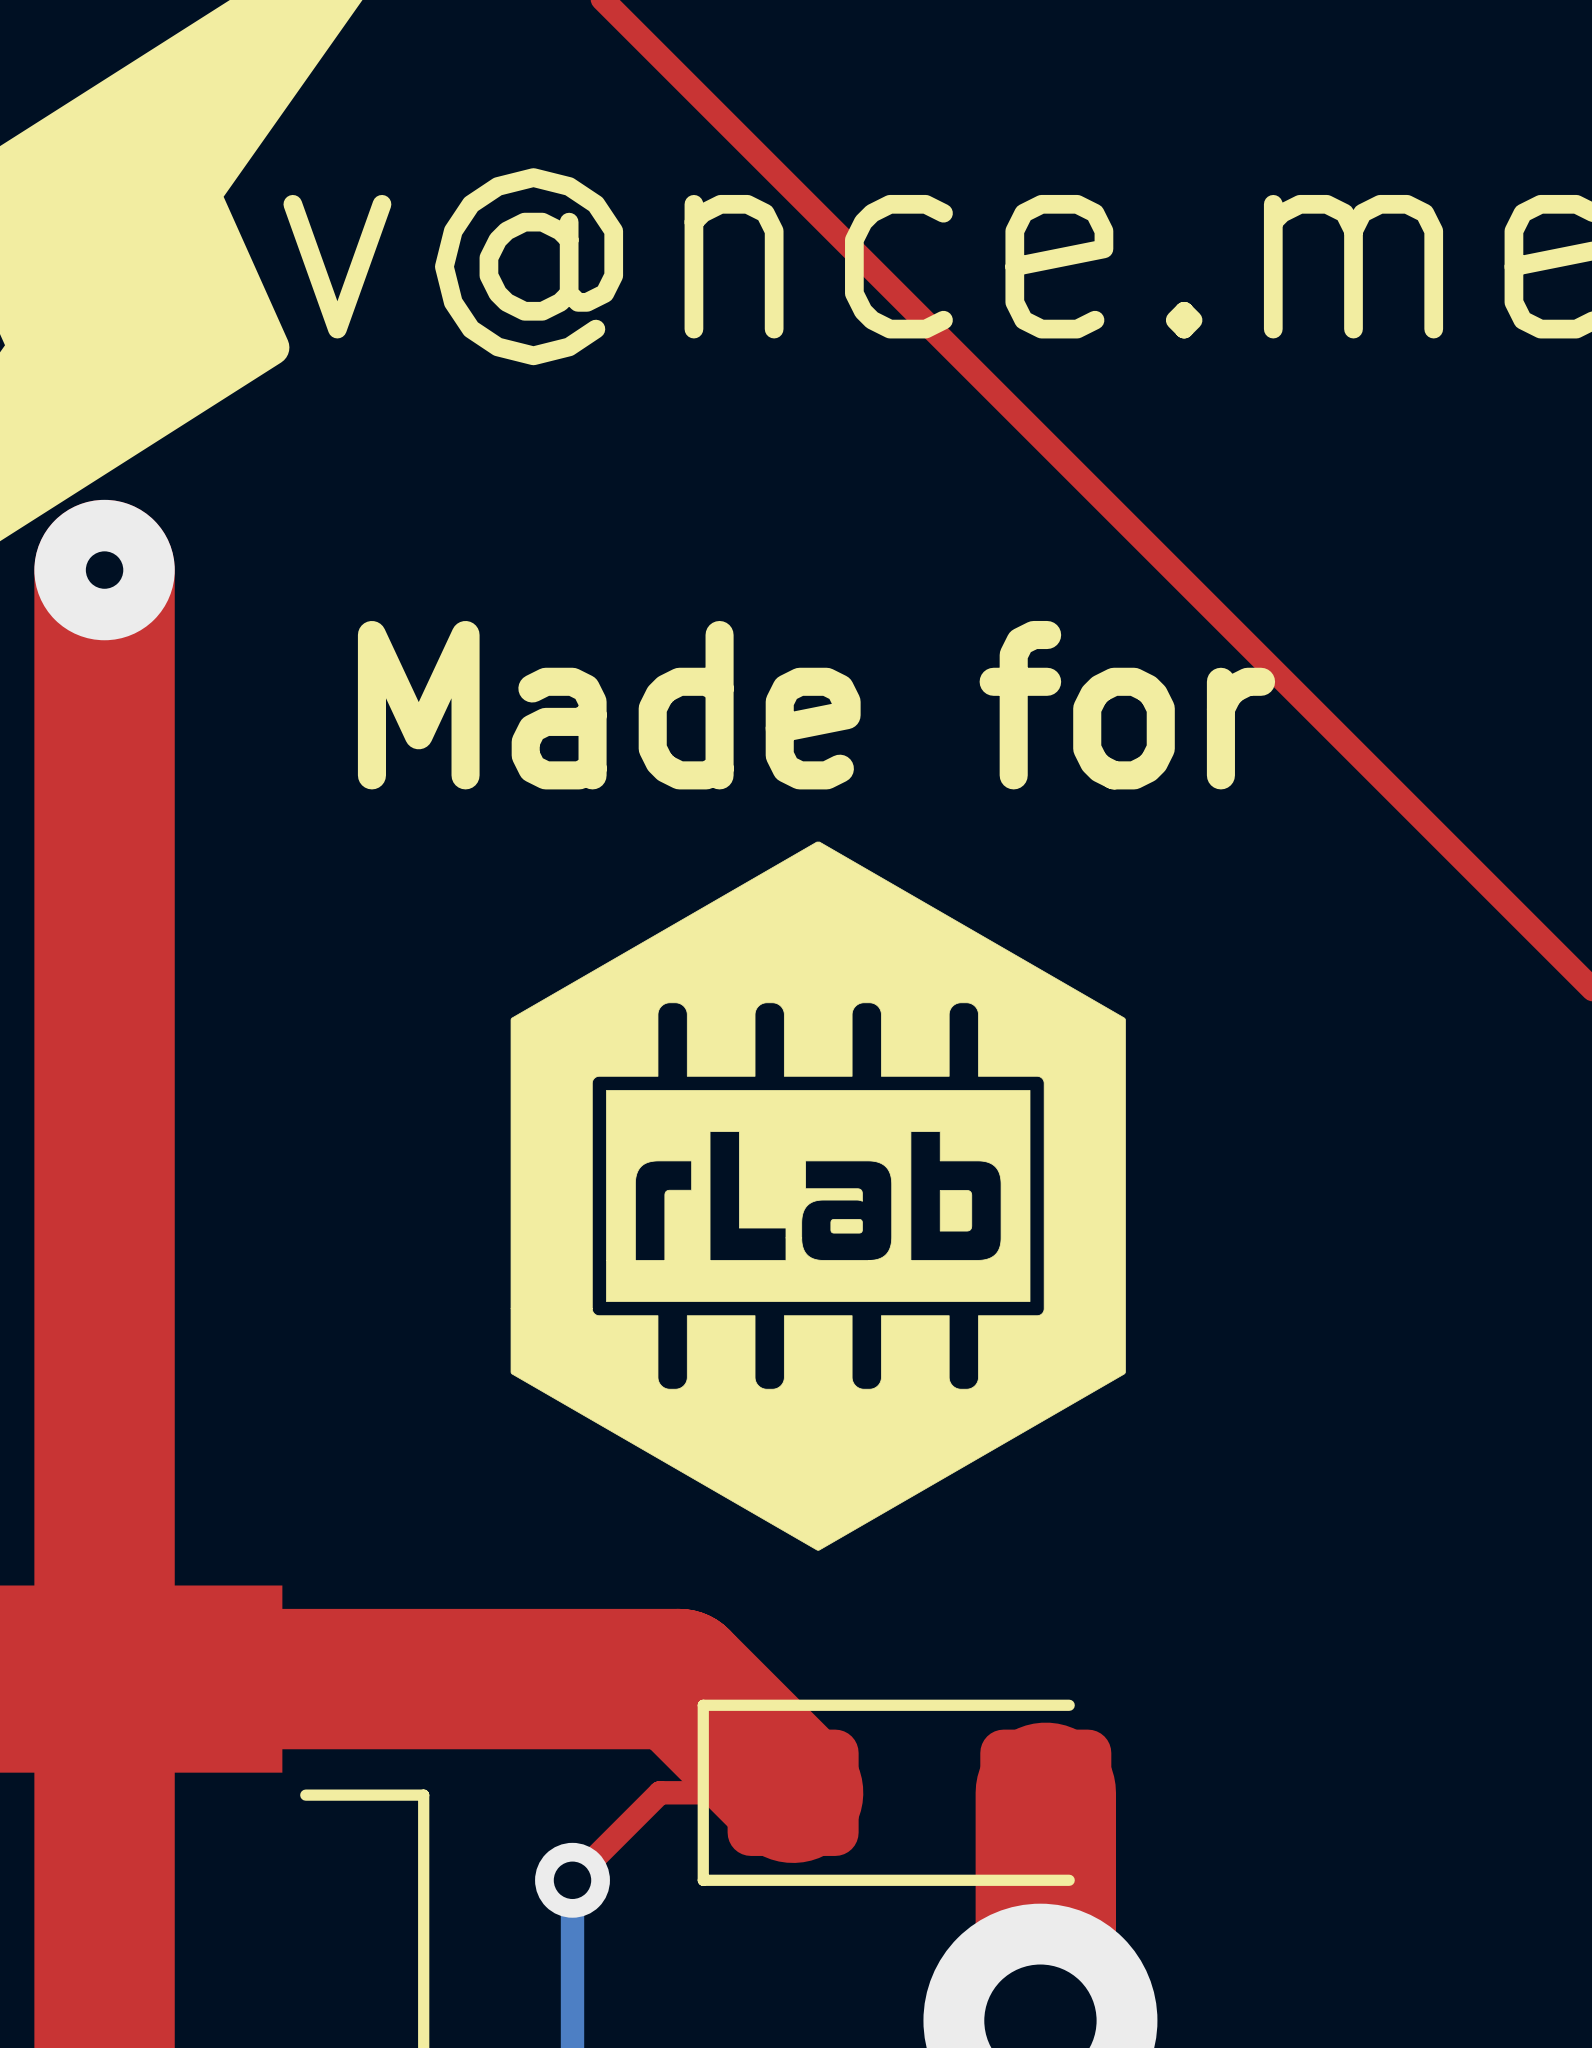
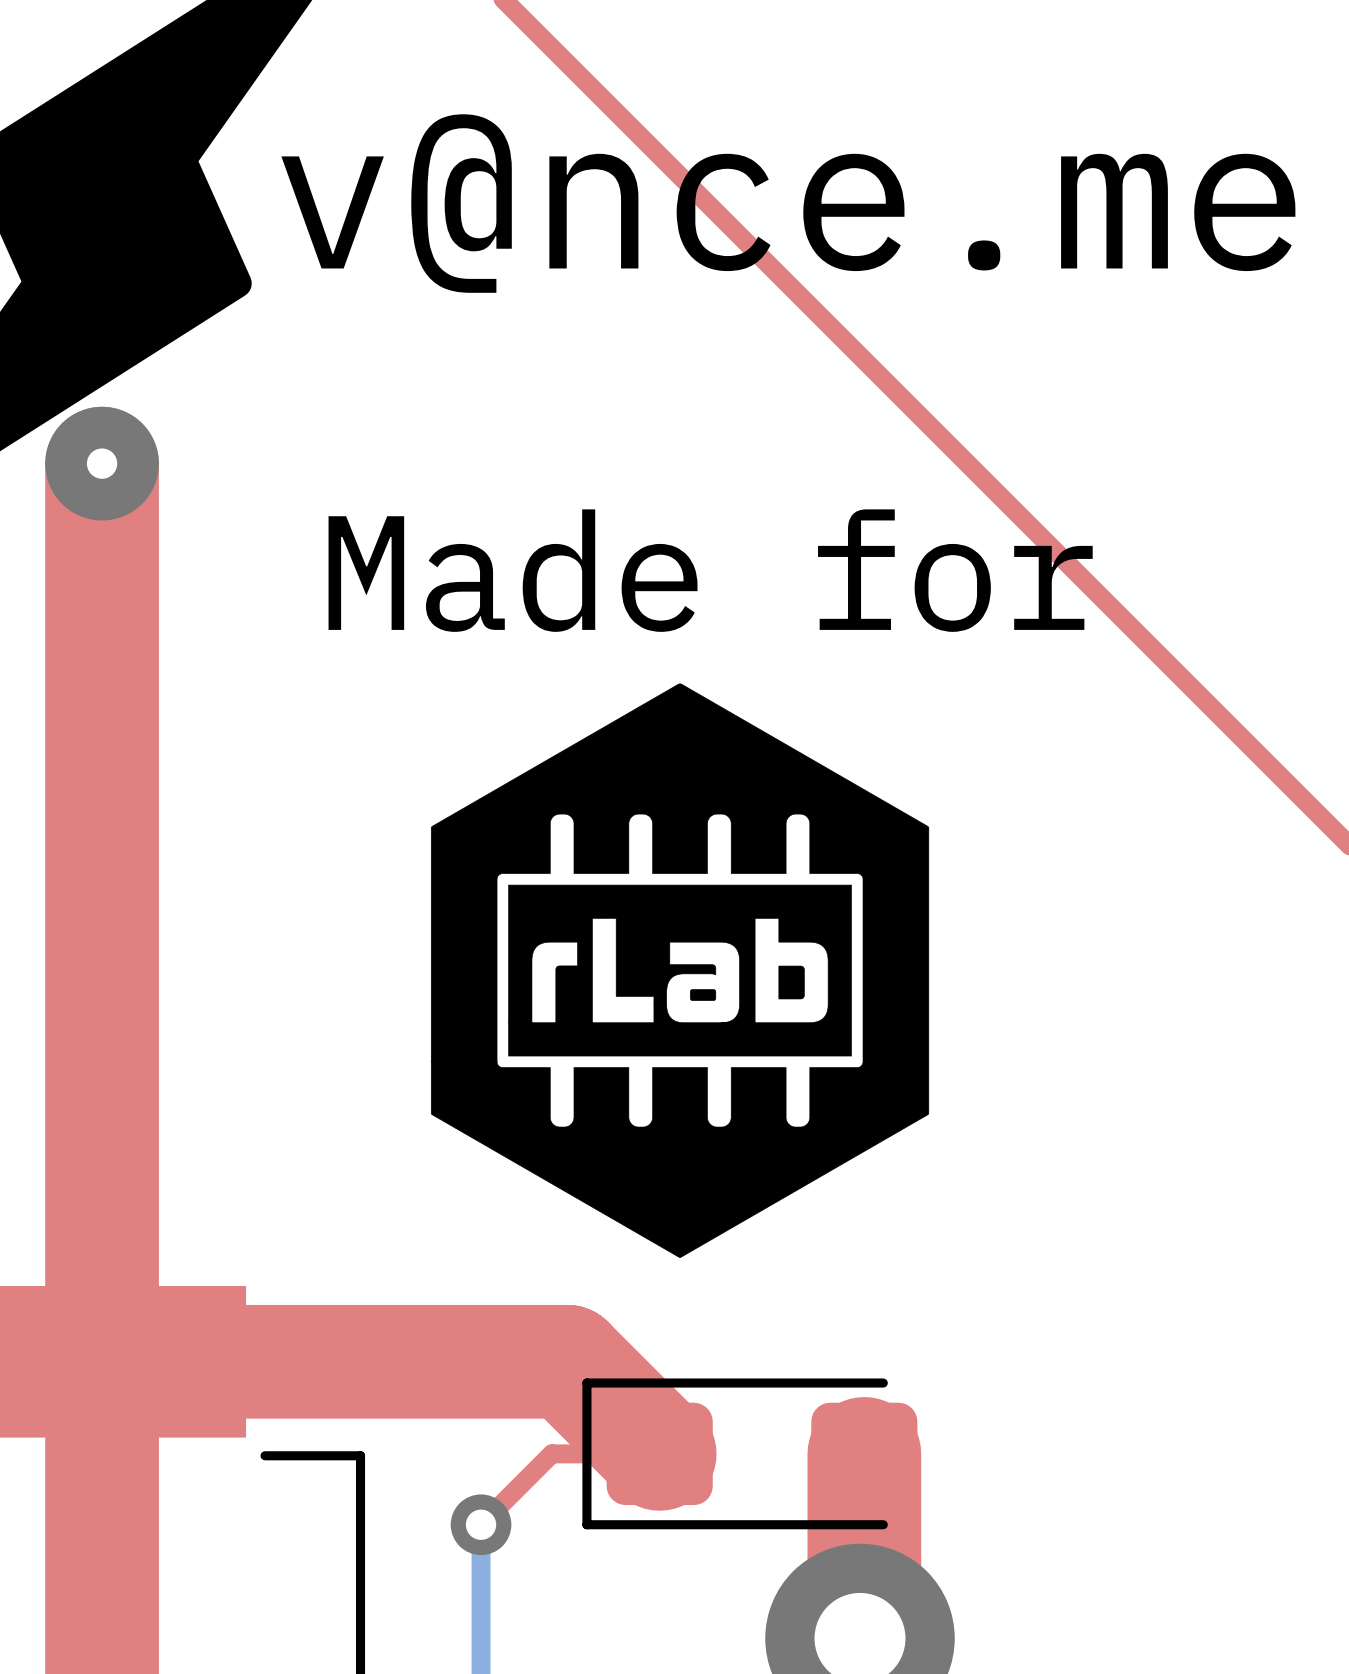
text position: Made for (816, 705) -> Made for (710, 570)

